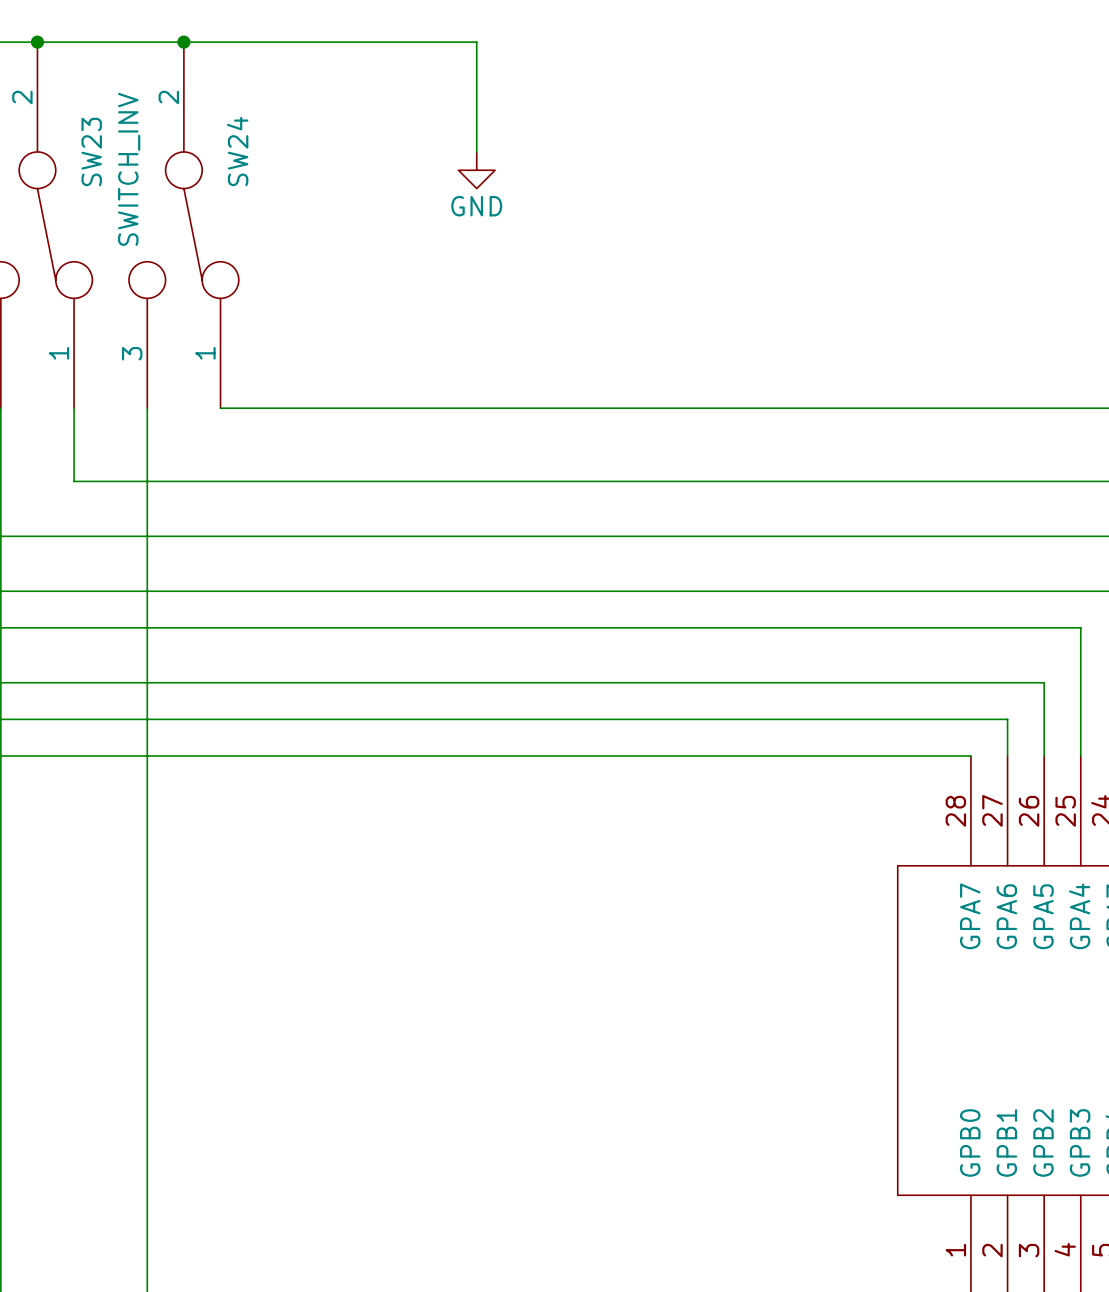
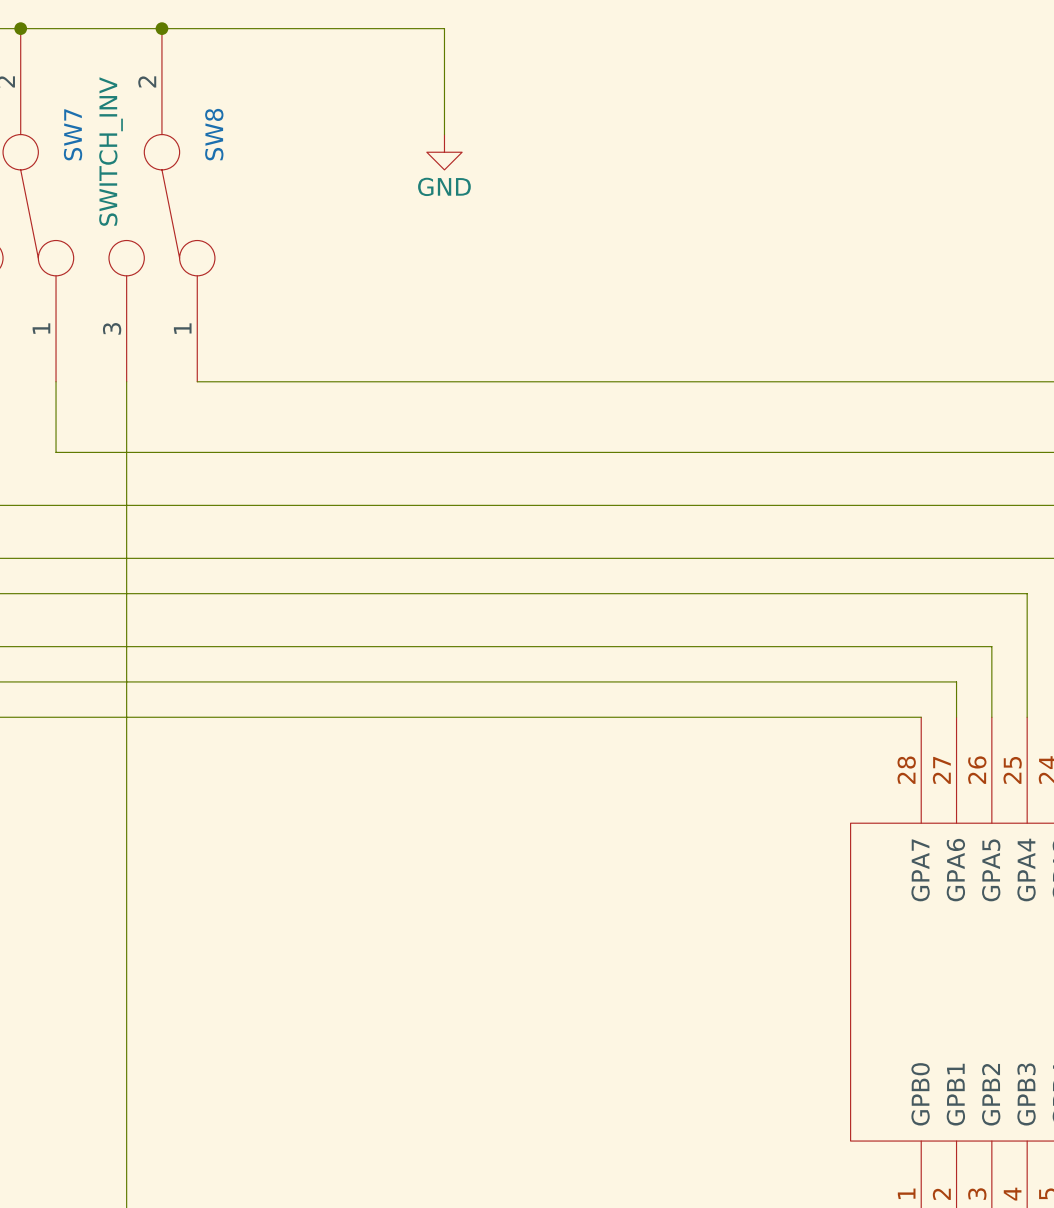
SW23 name: SW23 (91, 151) -> SW7 (73, 134)
SW24 name: SW24 (237, 151) -> SW8 (214, 134)

